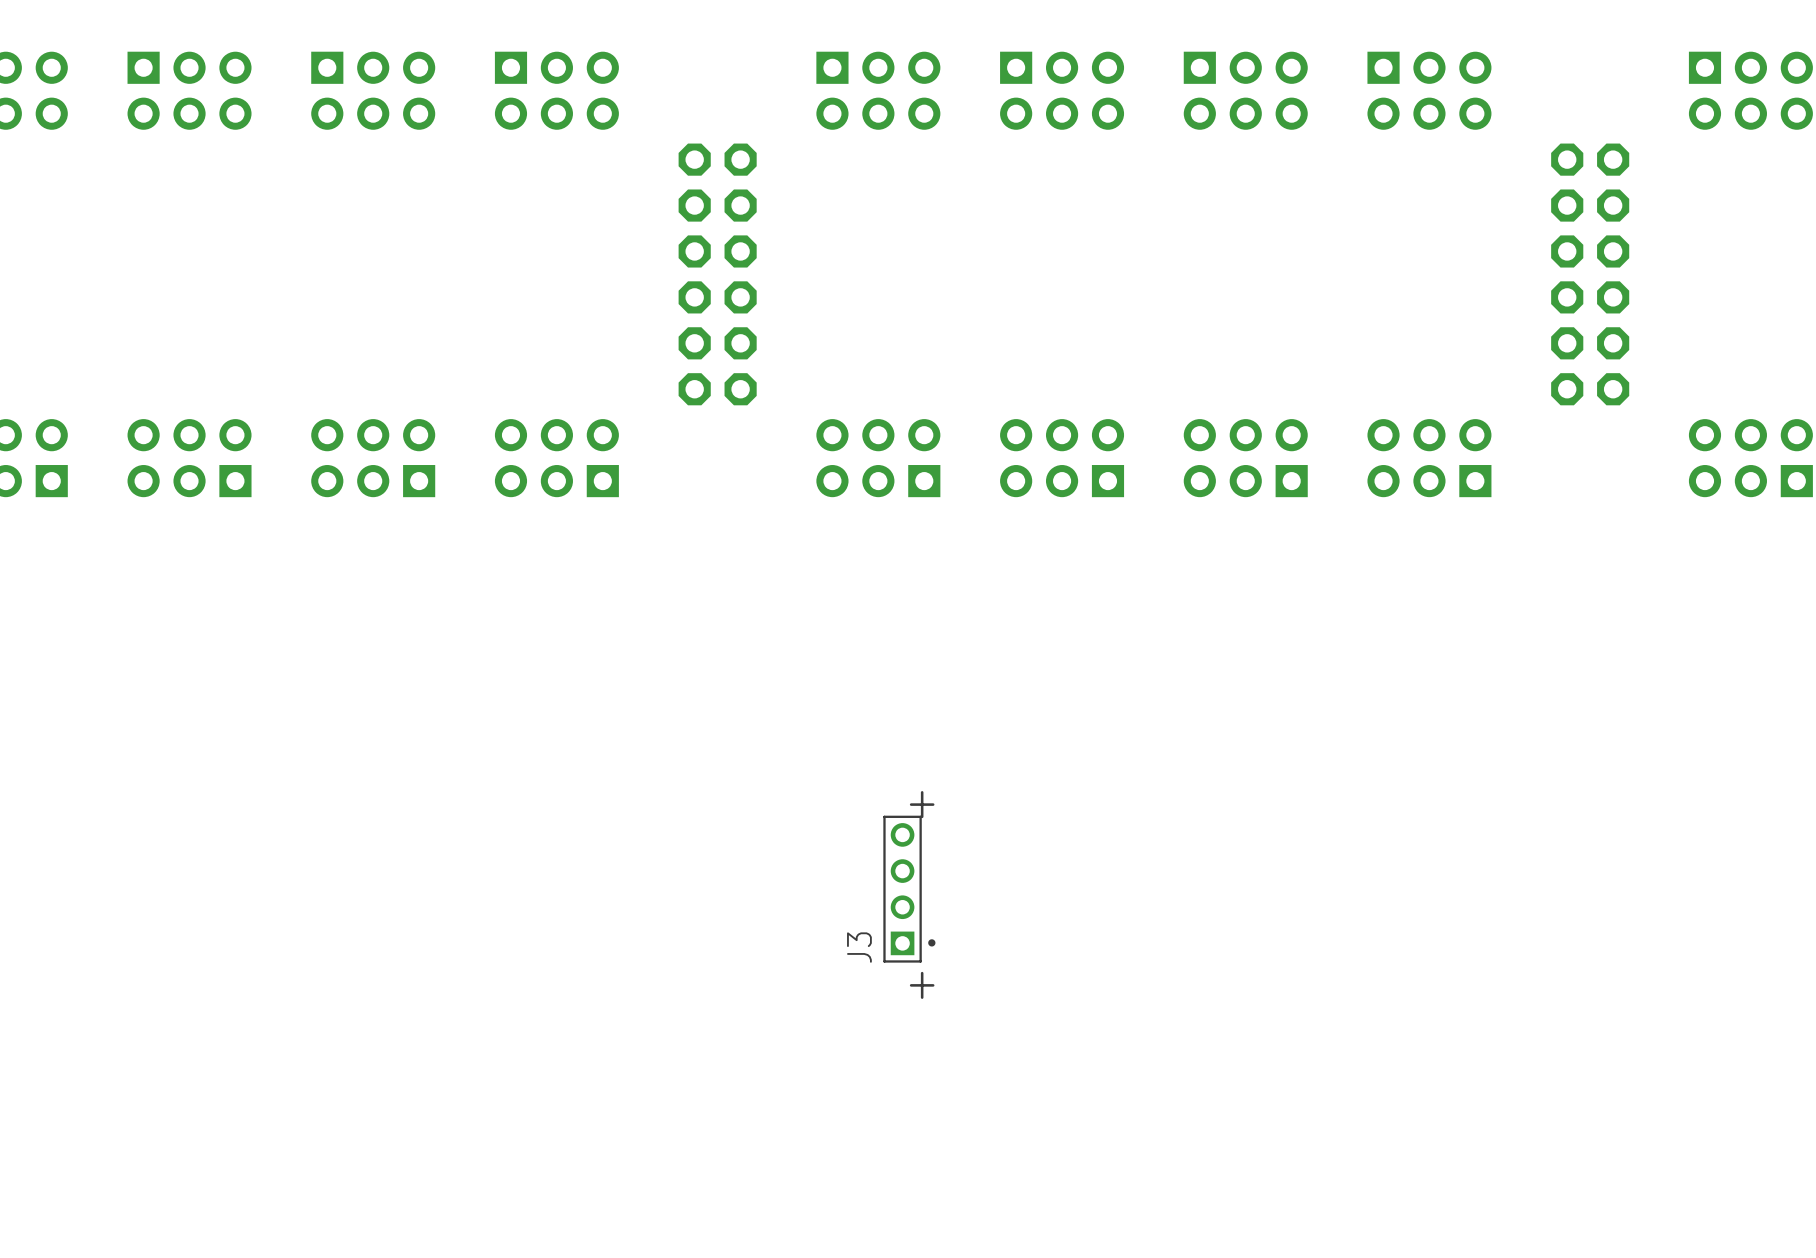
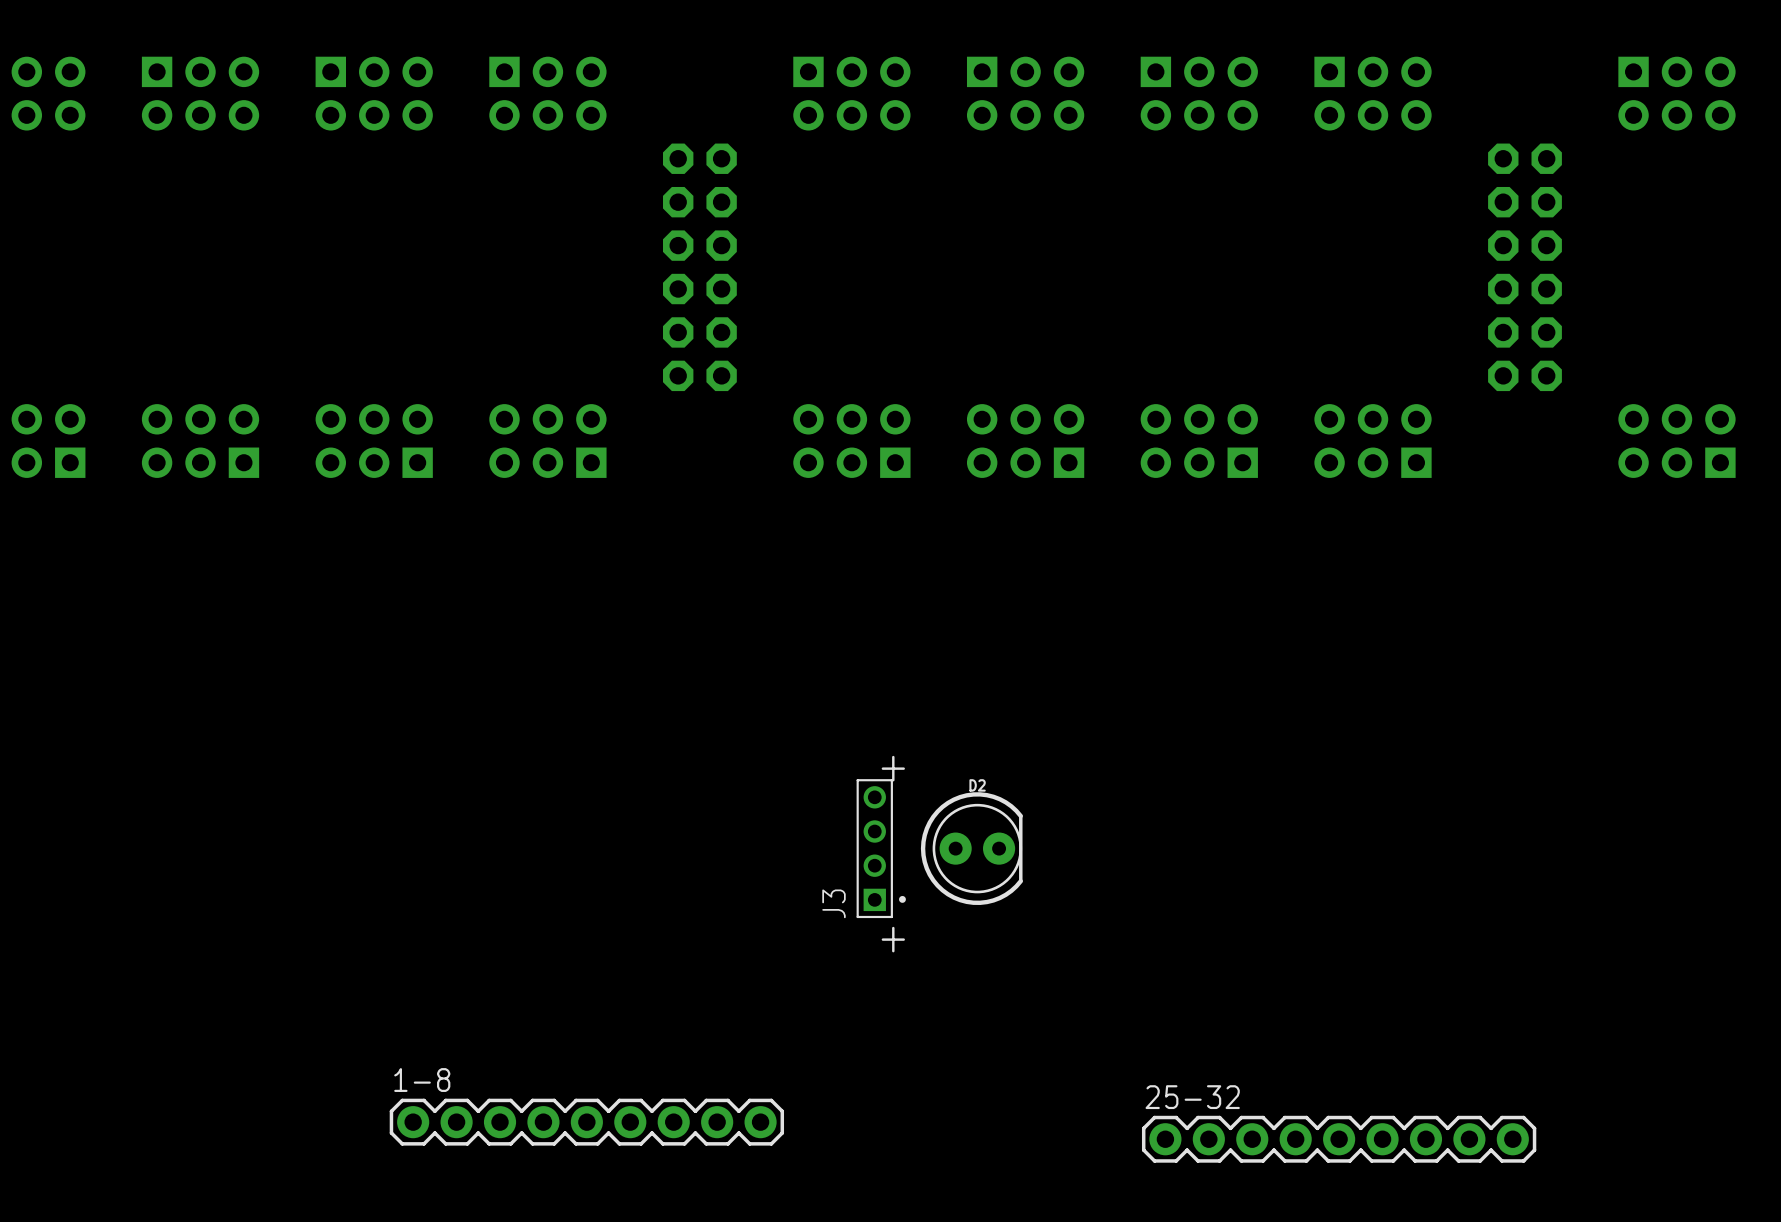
D2: none -> (971, 848)
1-8: none -> (586, 1122)
25-32: none -> (1339, 1139)

